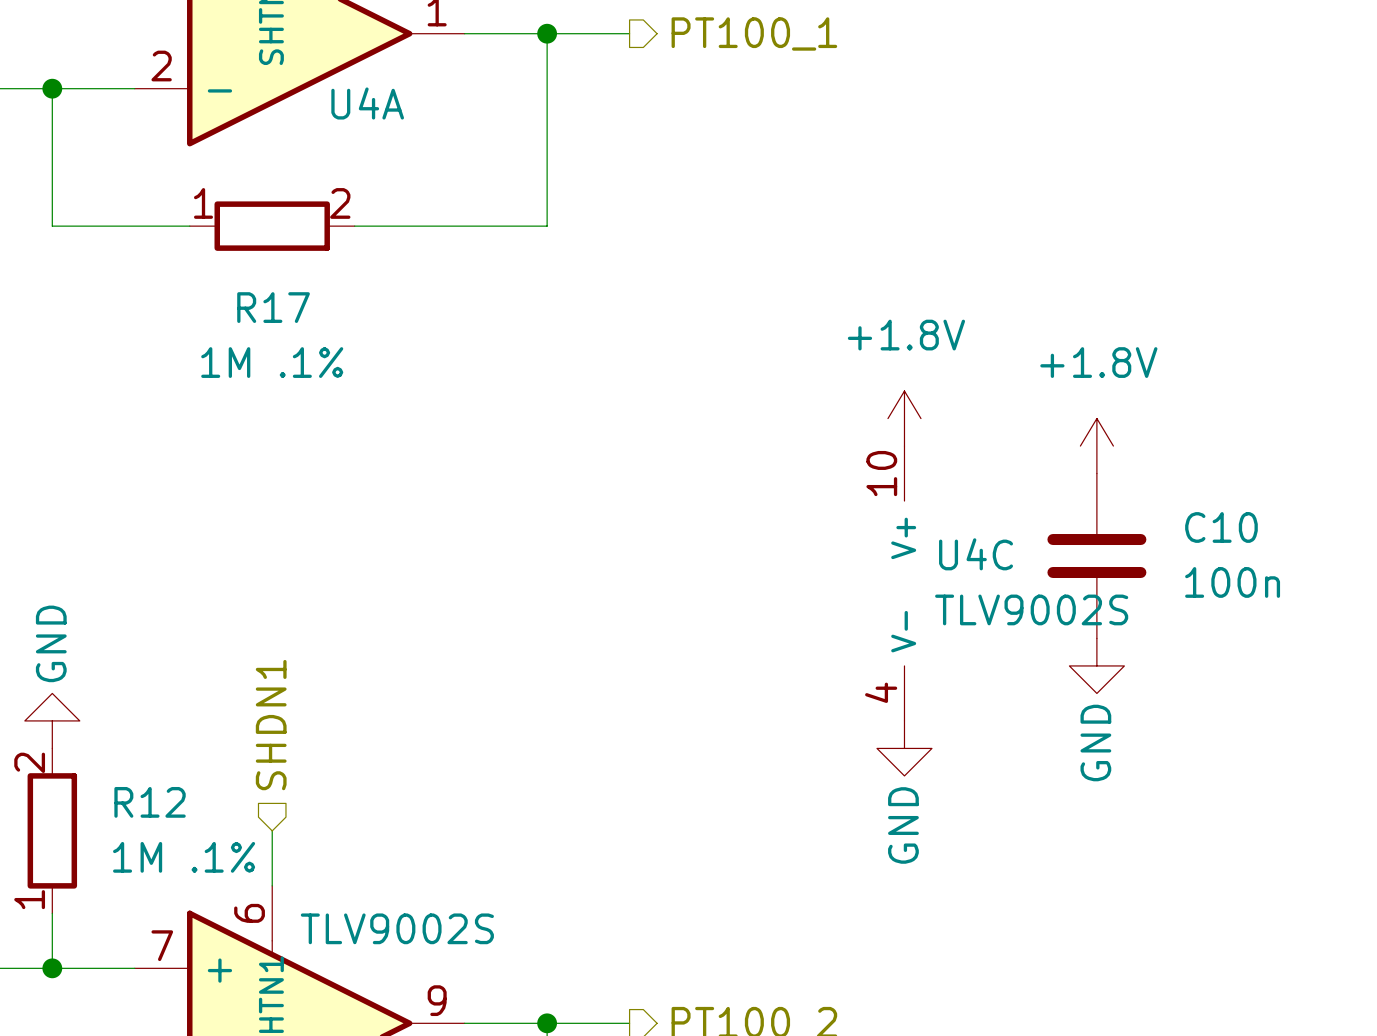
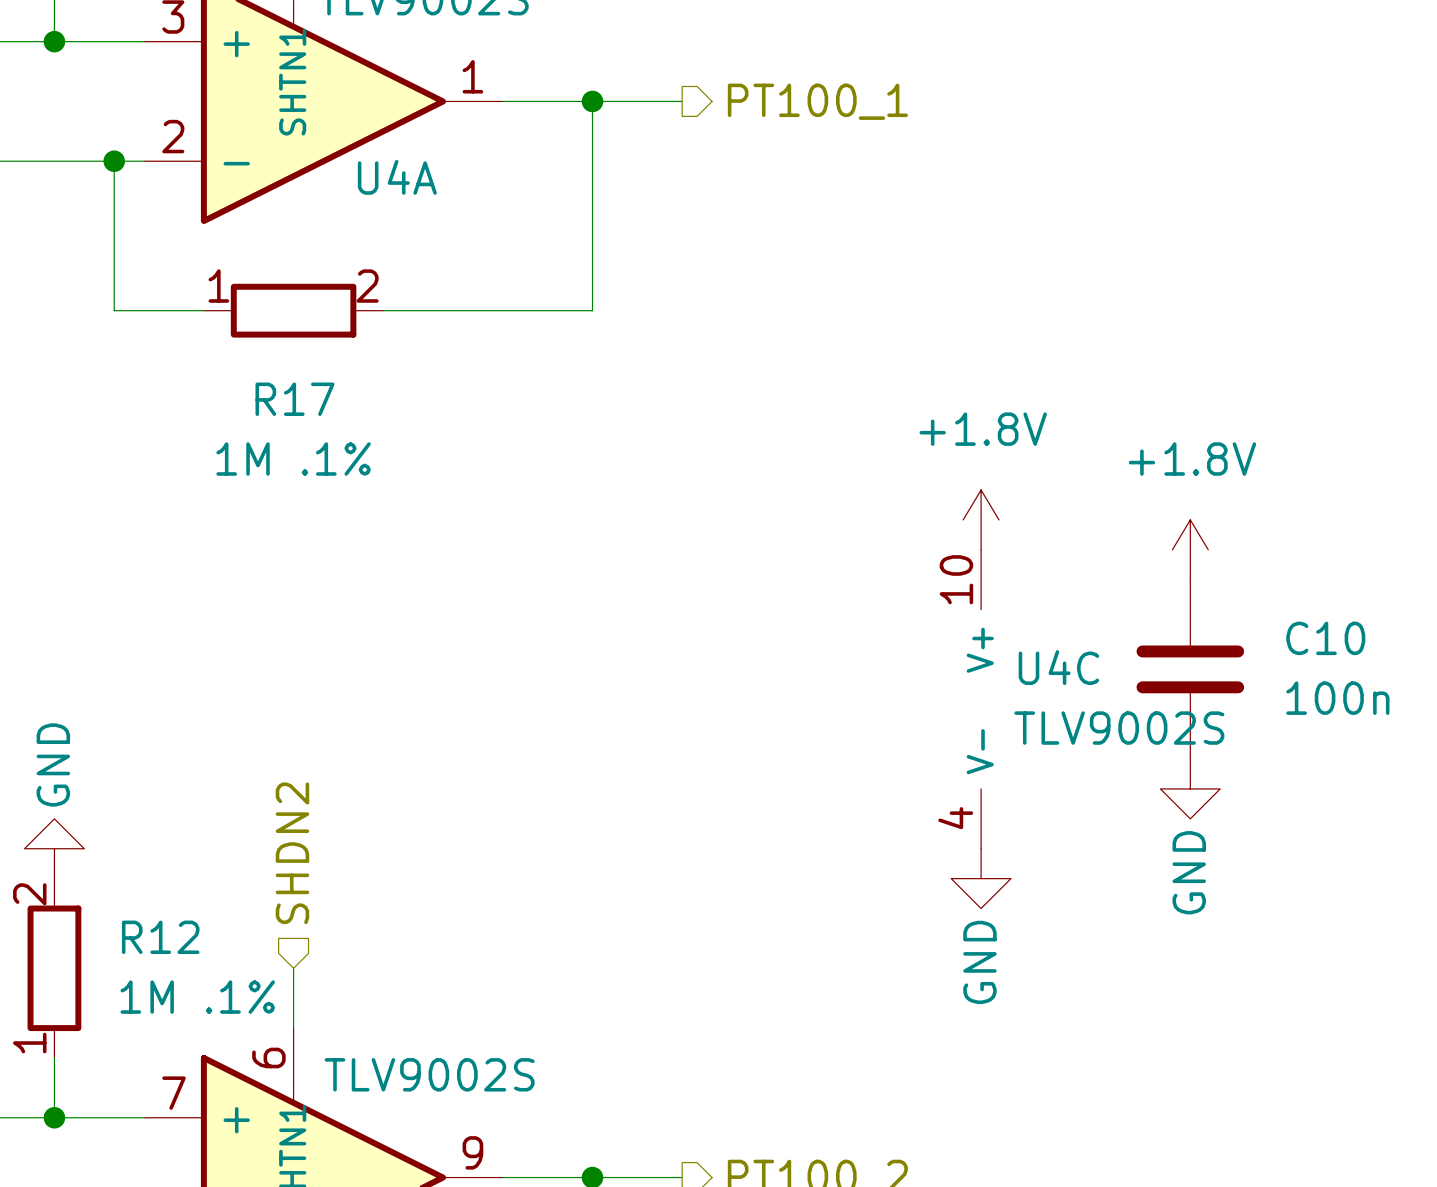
wire: (52, 88) (52, 226) (107, 226) -> (114, 161) (114, 310)
junction position: (52, 88) -> (114, 161)
hierarchical label: SHDN1 (271, 725) -> SHDN2 (292, 853)

